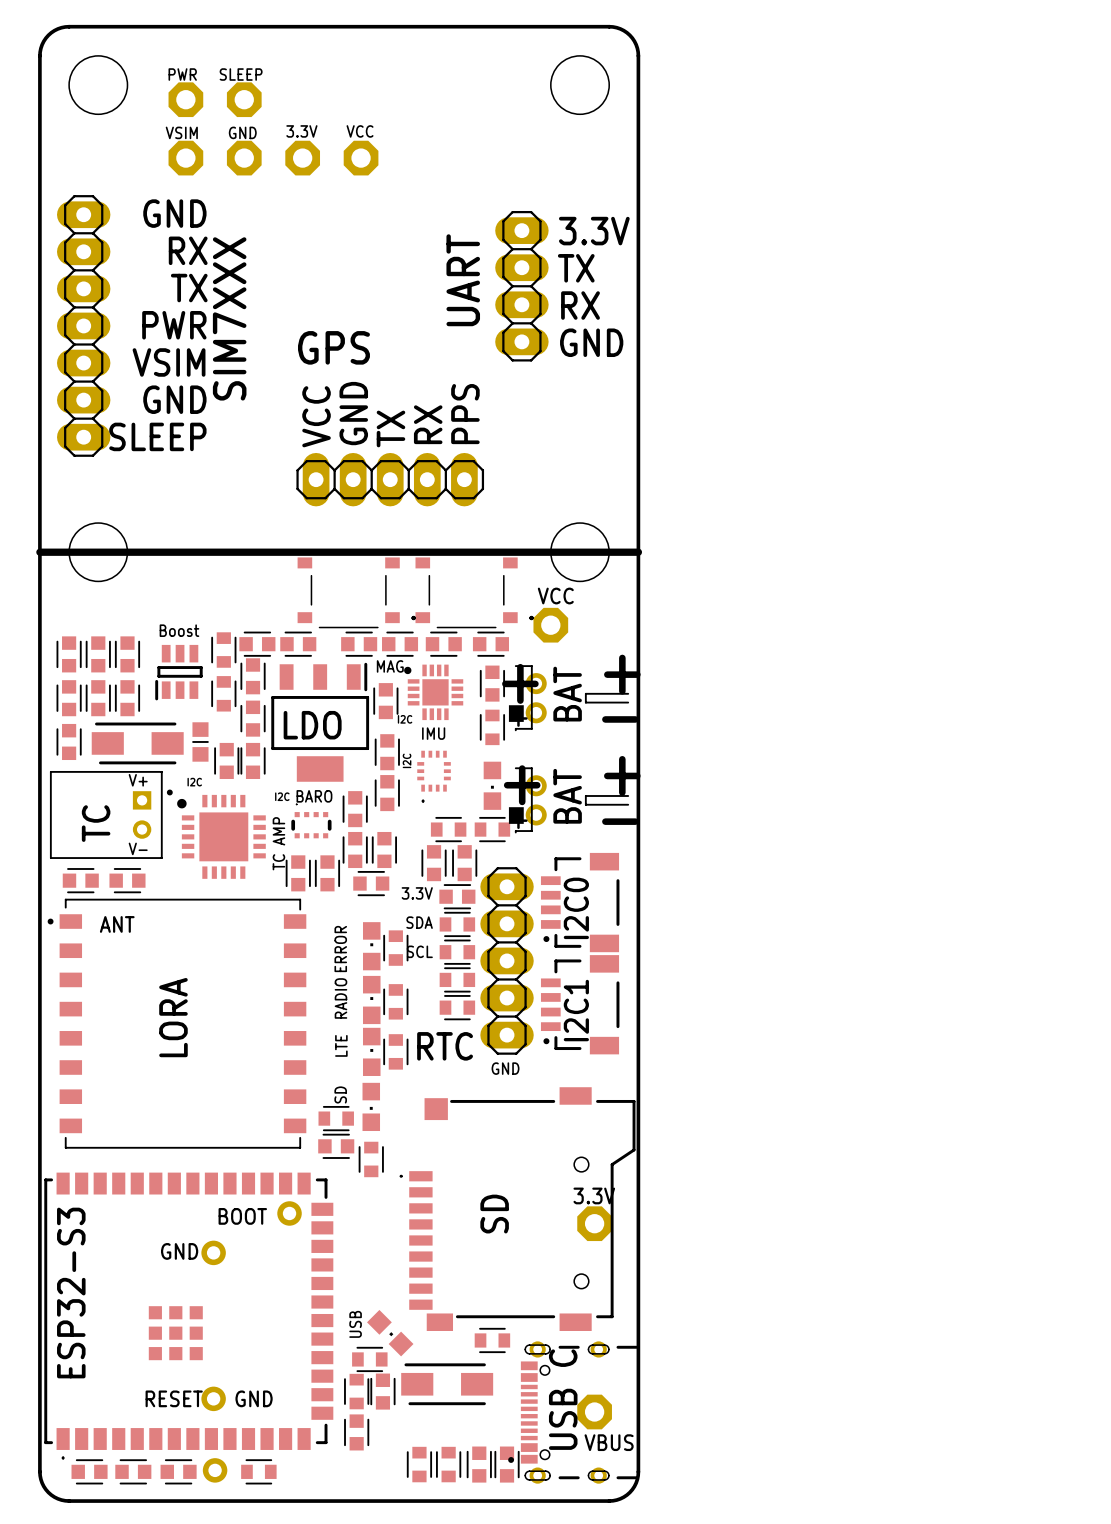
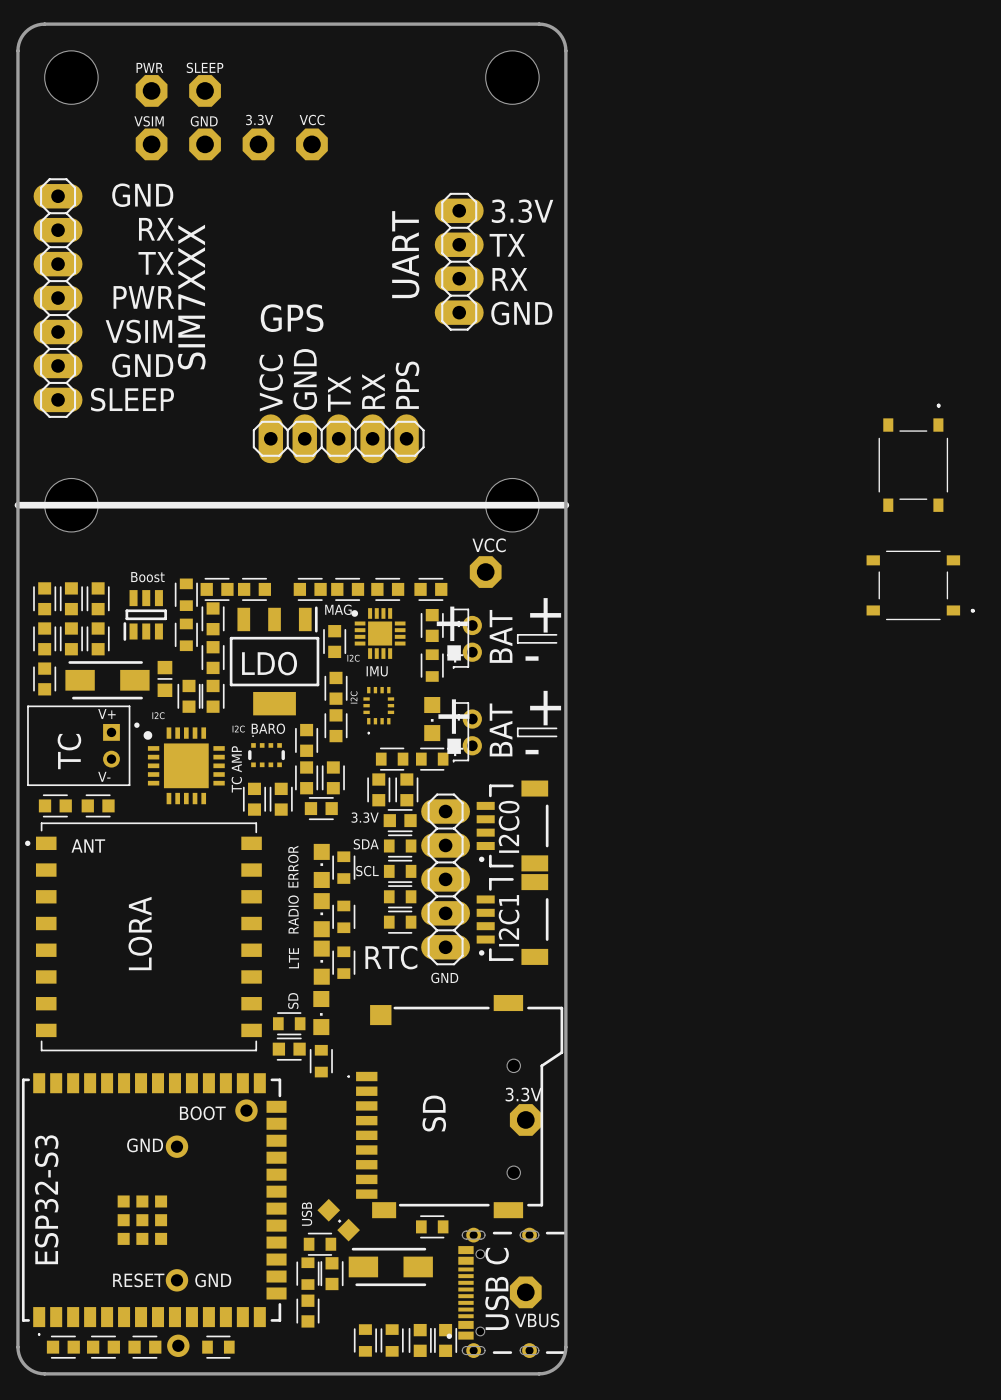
part: none -> (913, 457)
part: (356, 590) -> none
part: (474, 590) -> none
part: none -> (920, 585)

